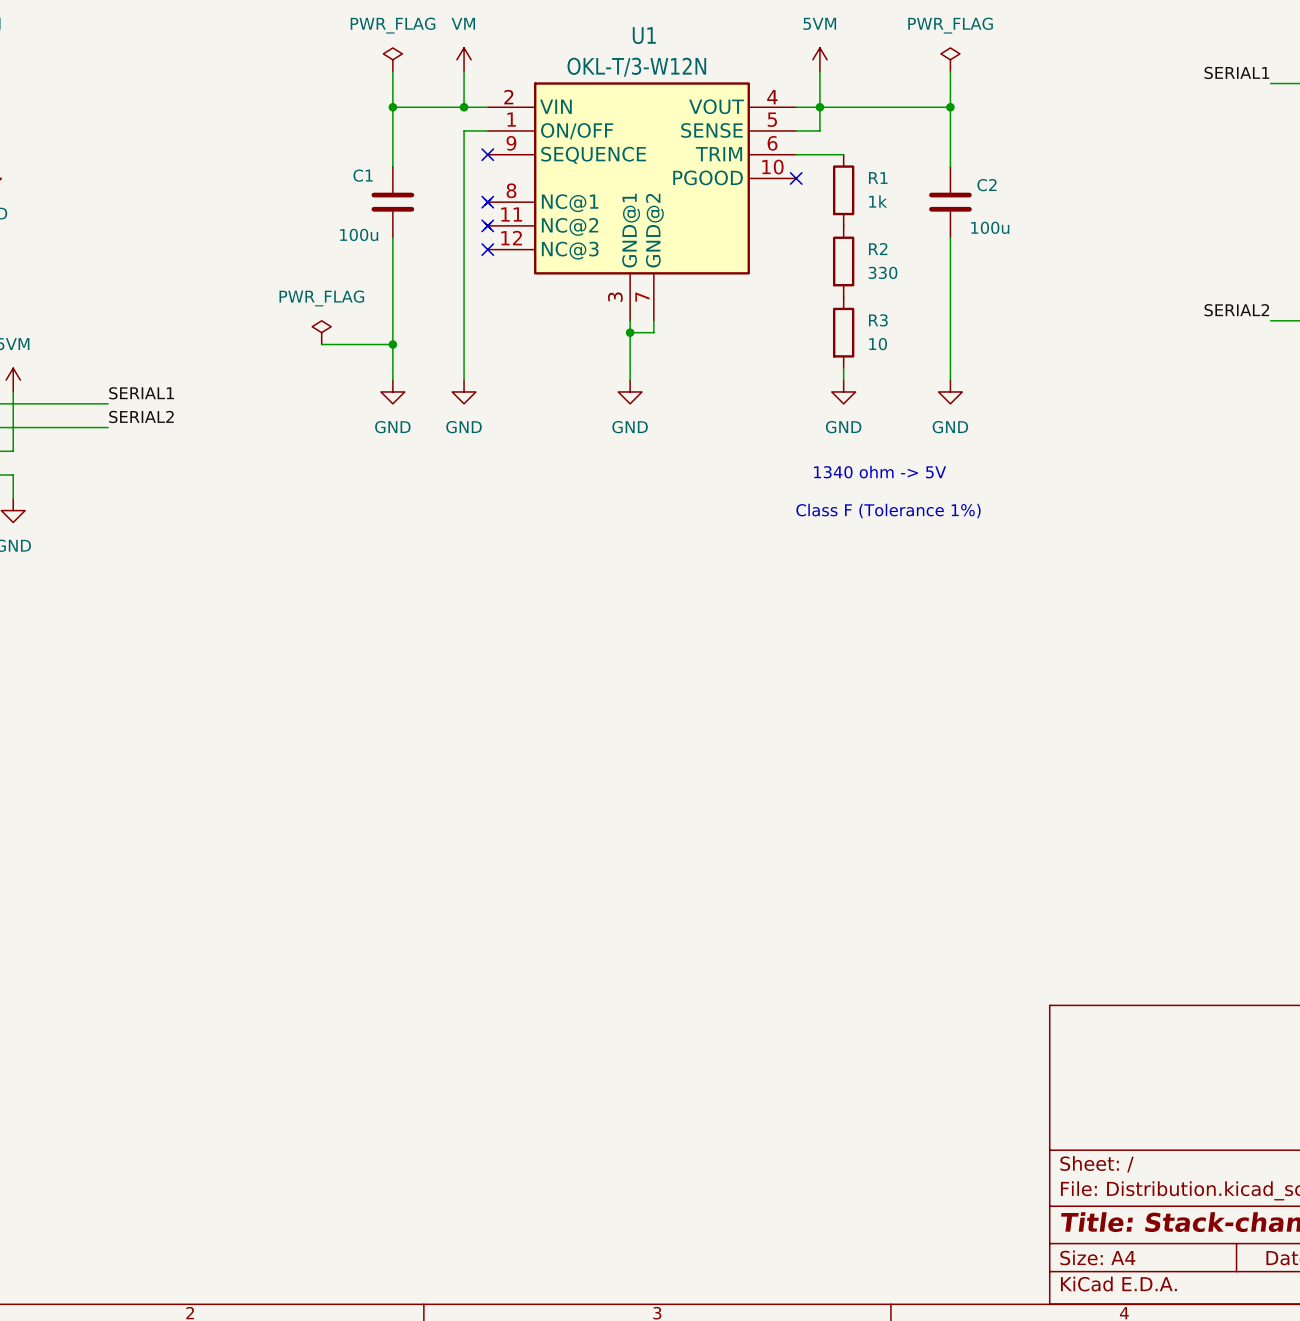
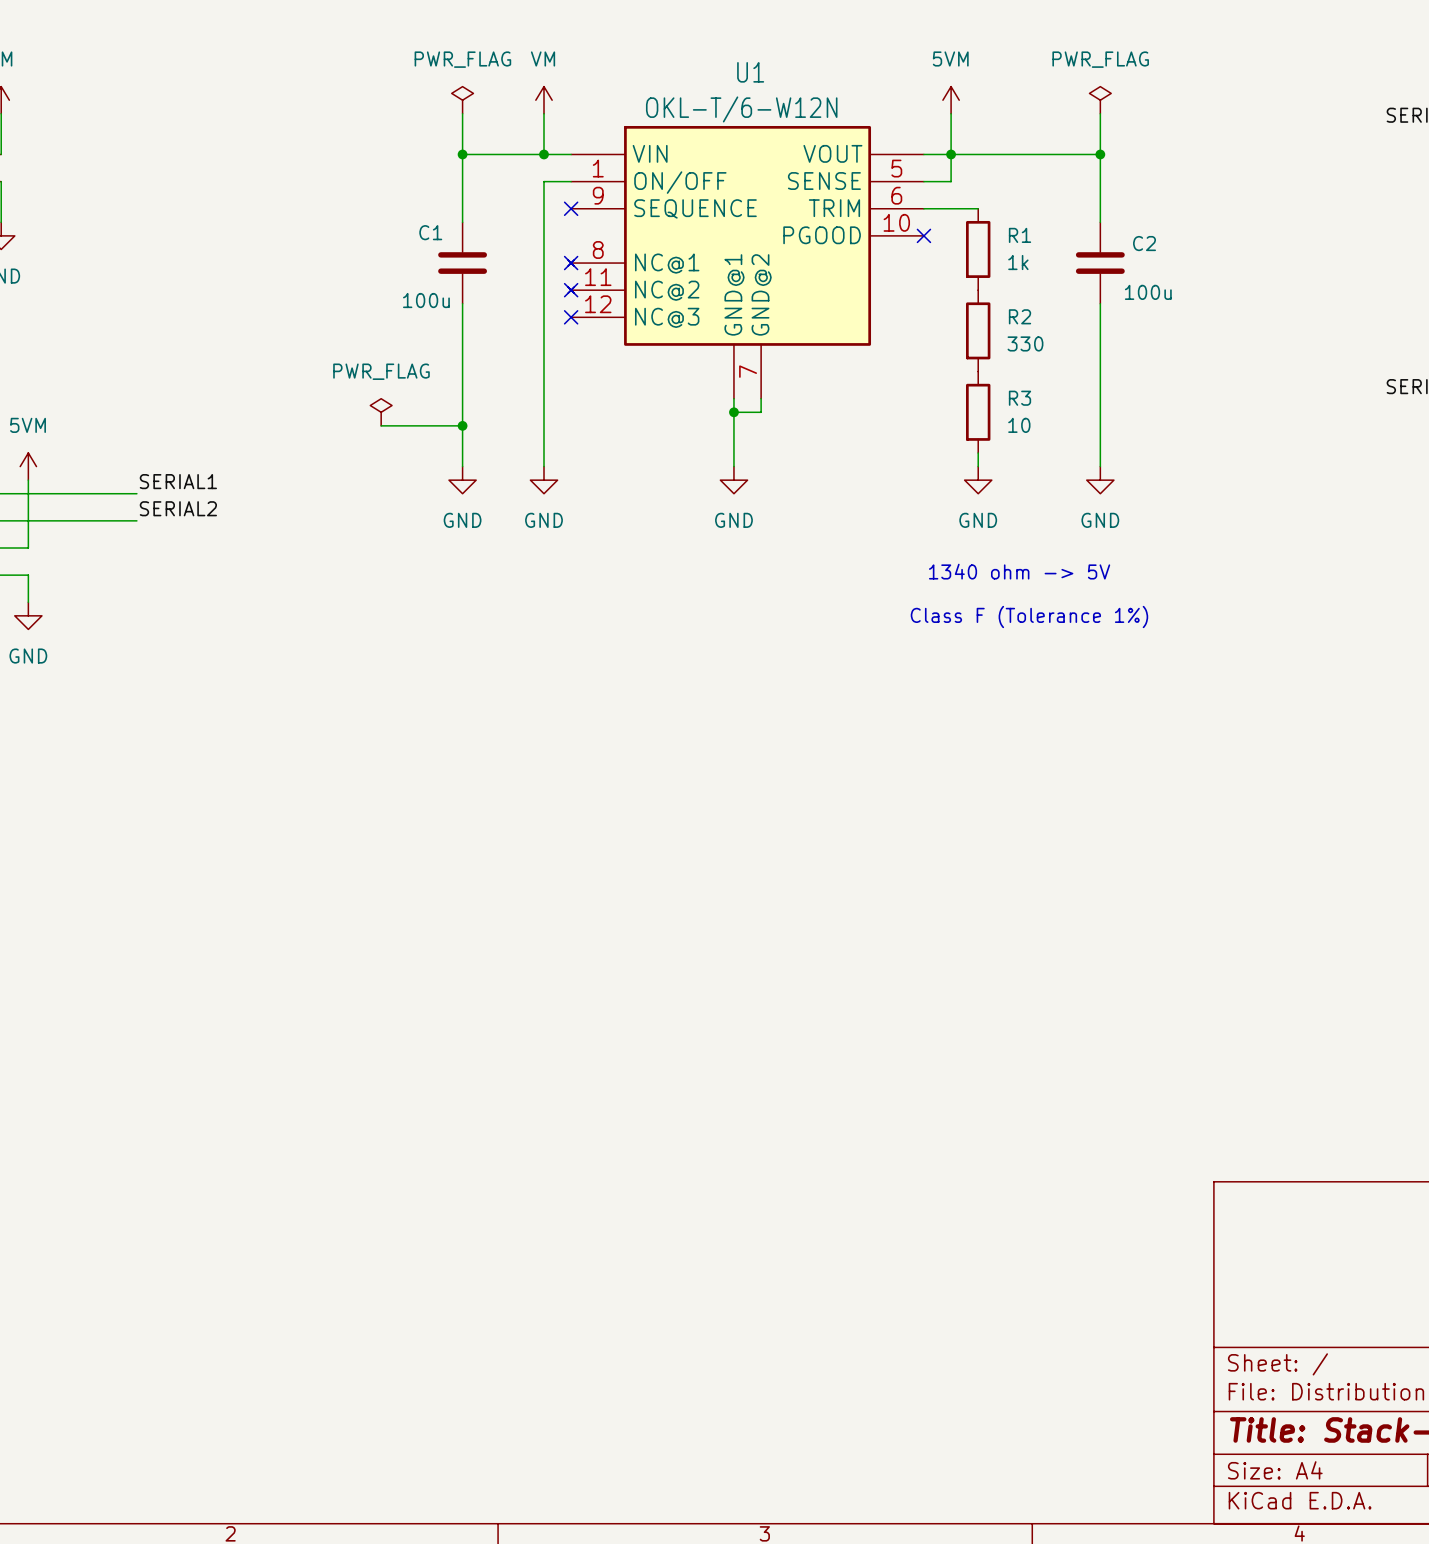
U1 value: OKL-T/3-W12N (636, 67) -> OKL-T/6-W12N (741, 109)
U1 text: 2 (508, 97) -> none
U1 text: 4 (772, 97) -> none
U1 text: 3 (615, 297) -> none

